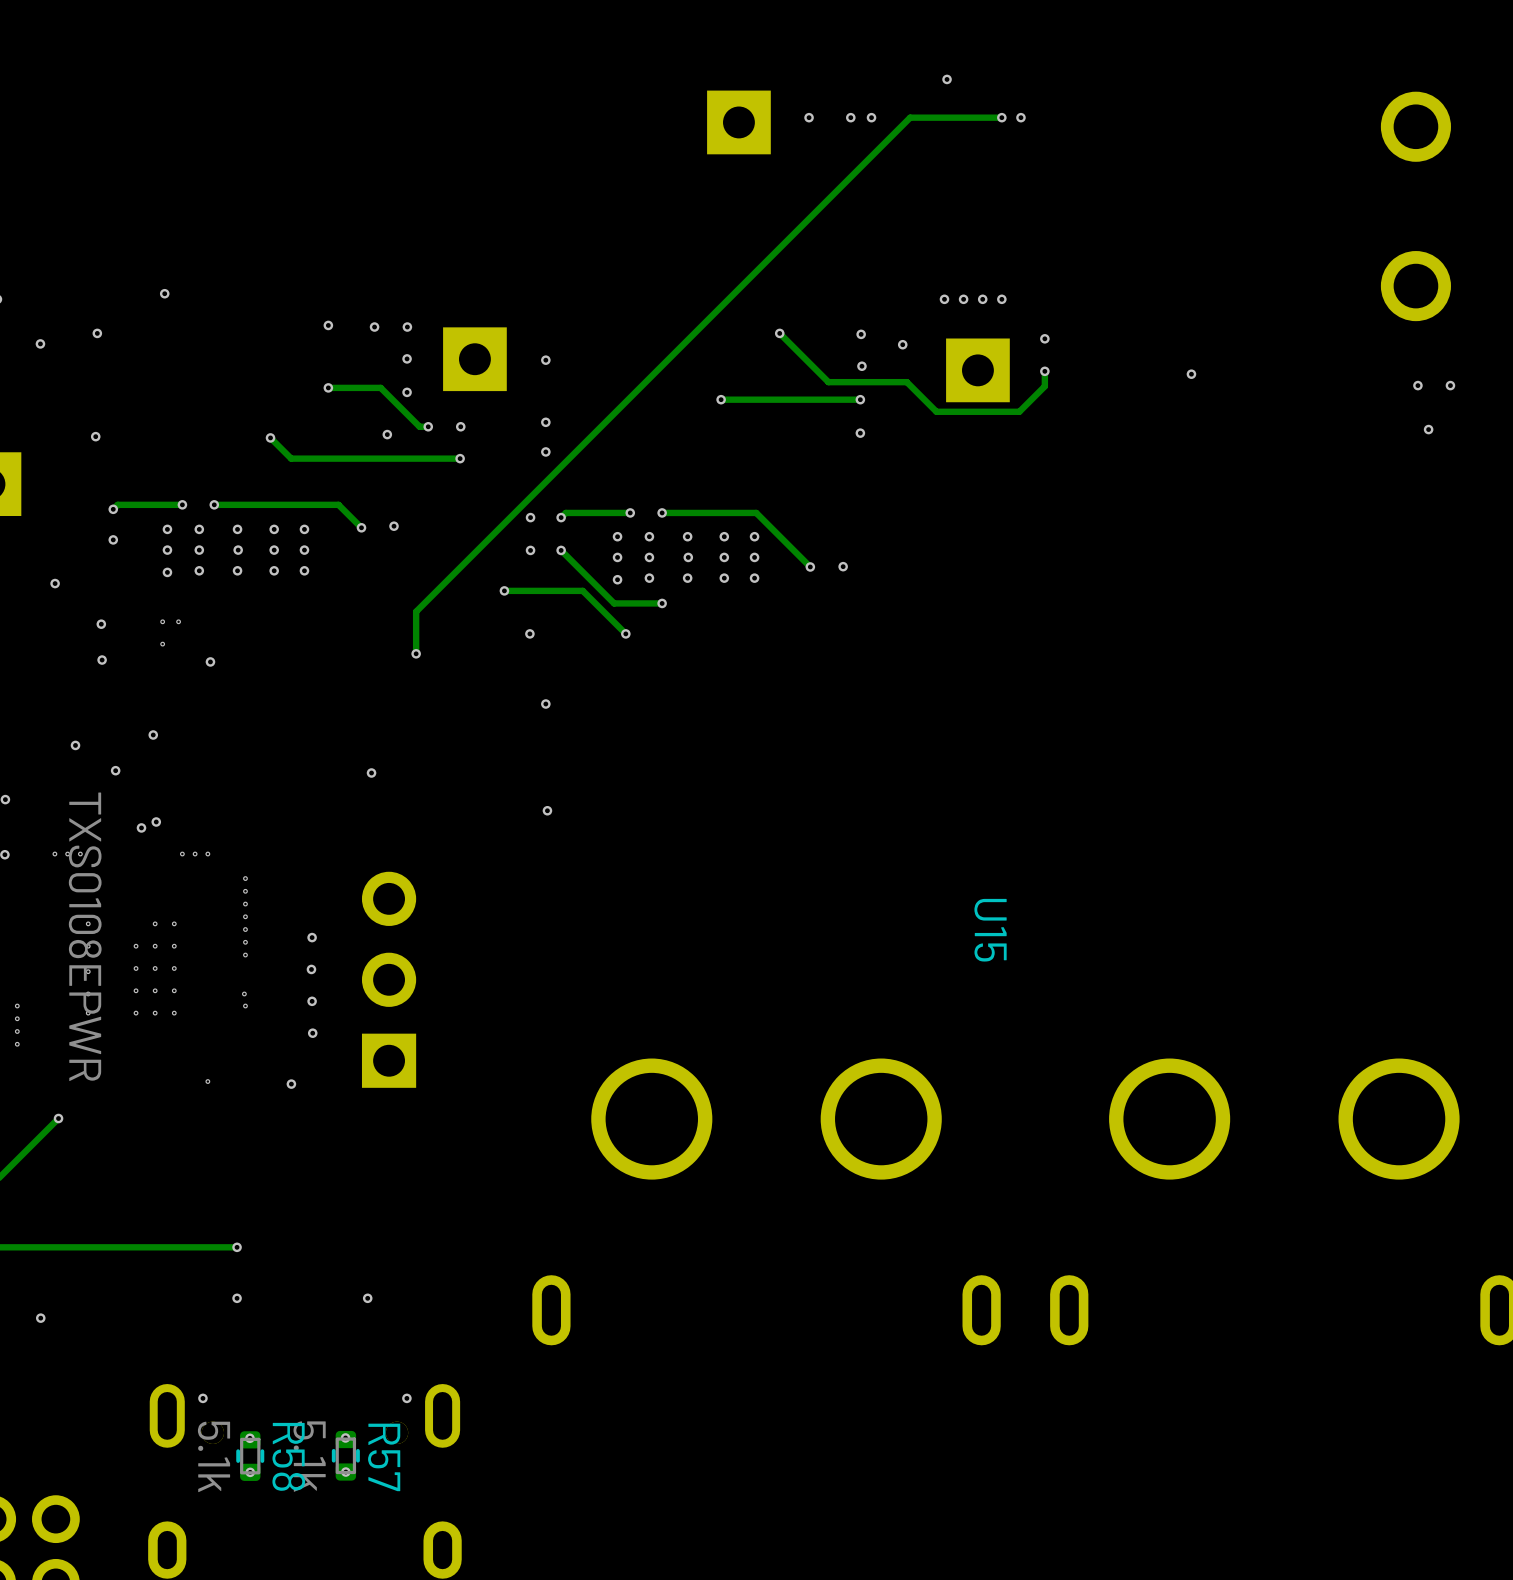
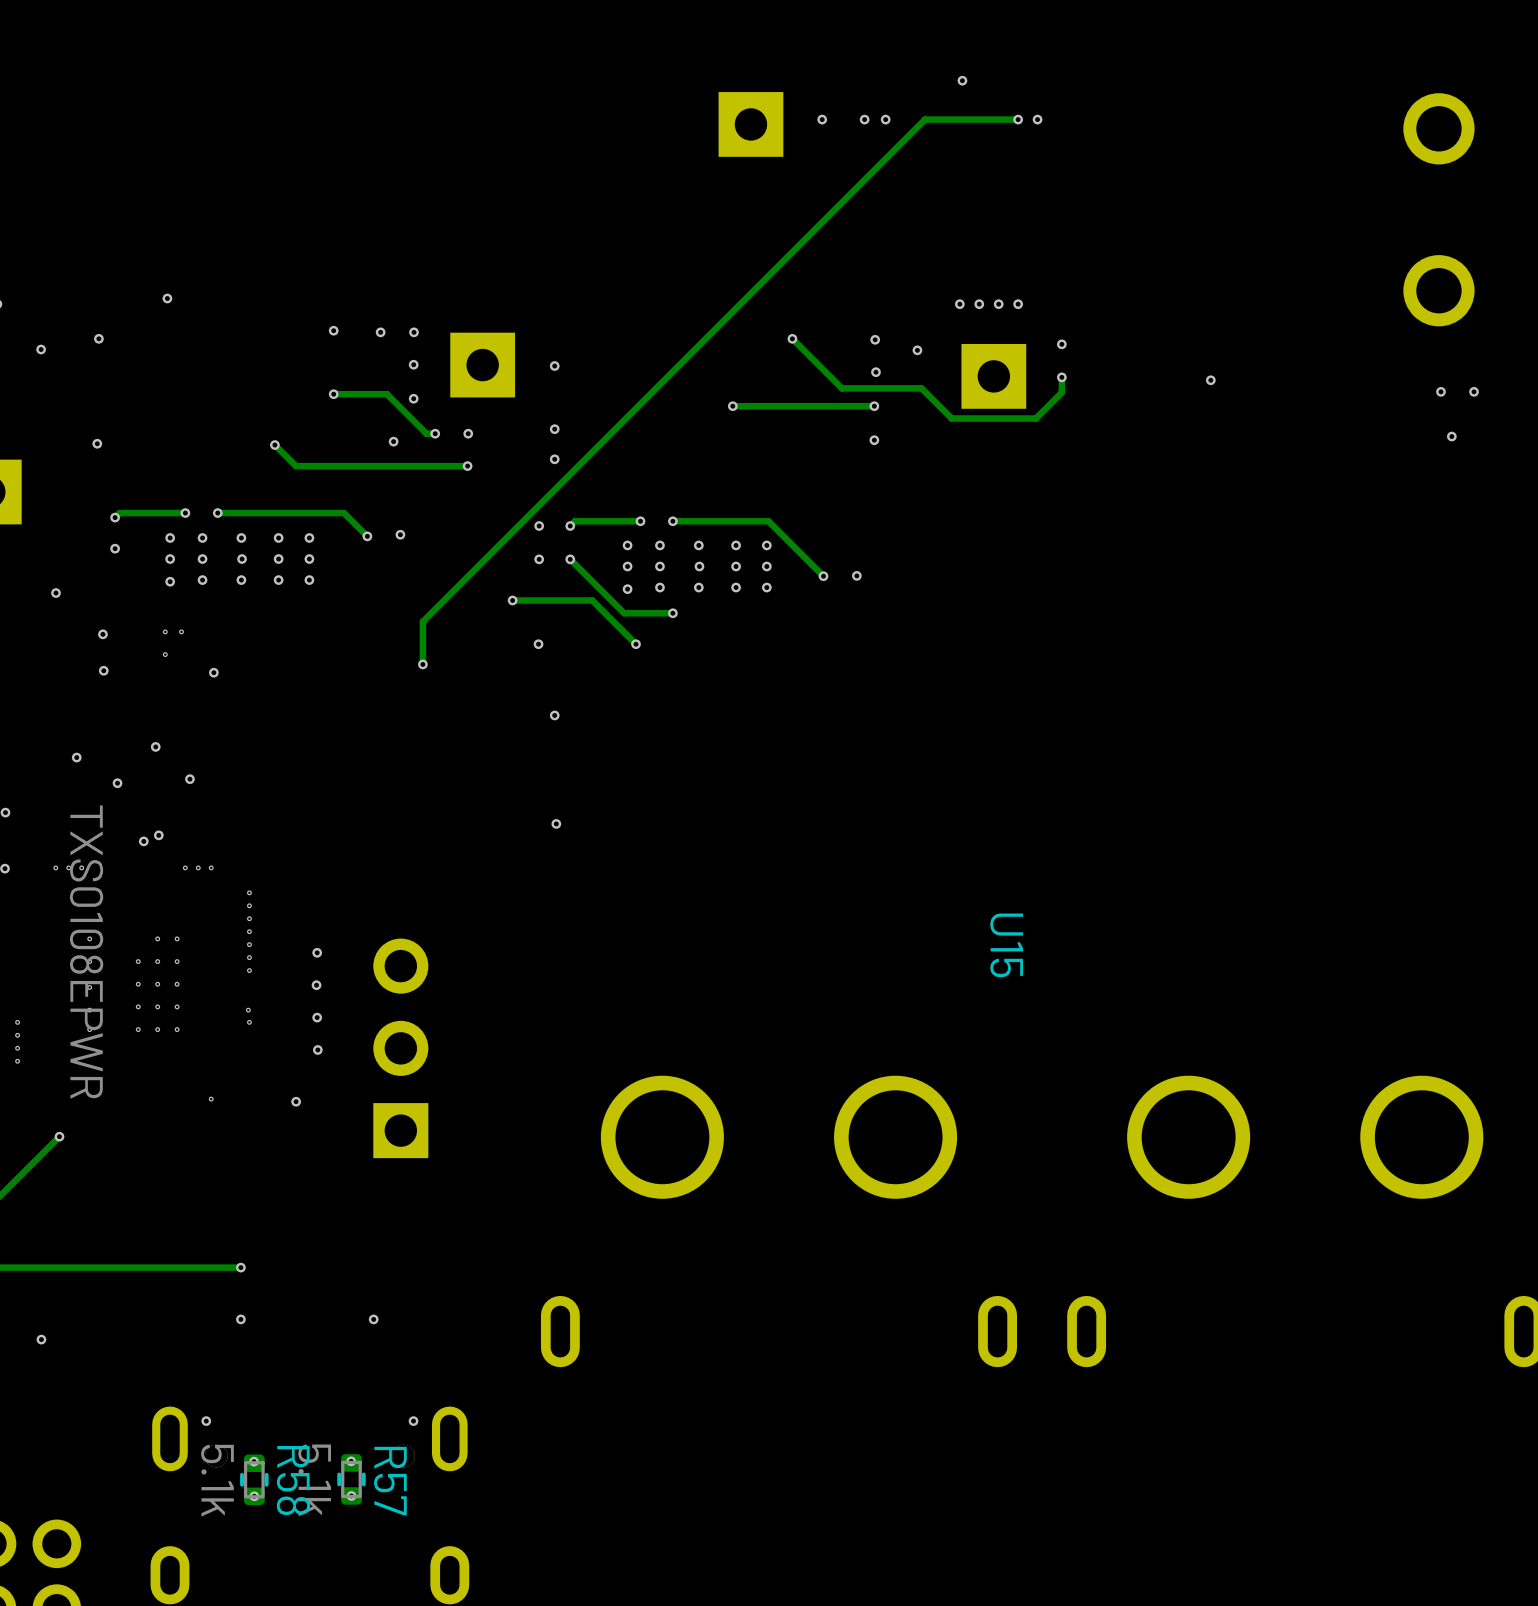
via position: (371, 772) -> (189, 779)
part position: (389, 979) -> (400, 1048)

